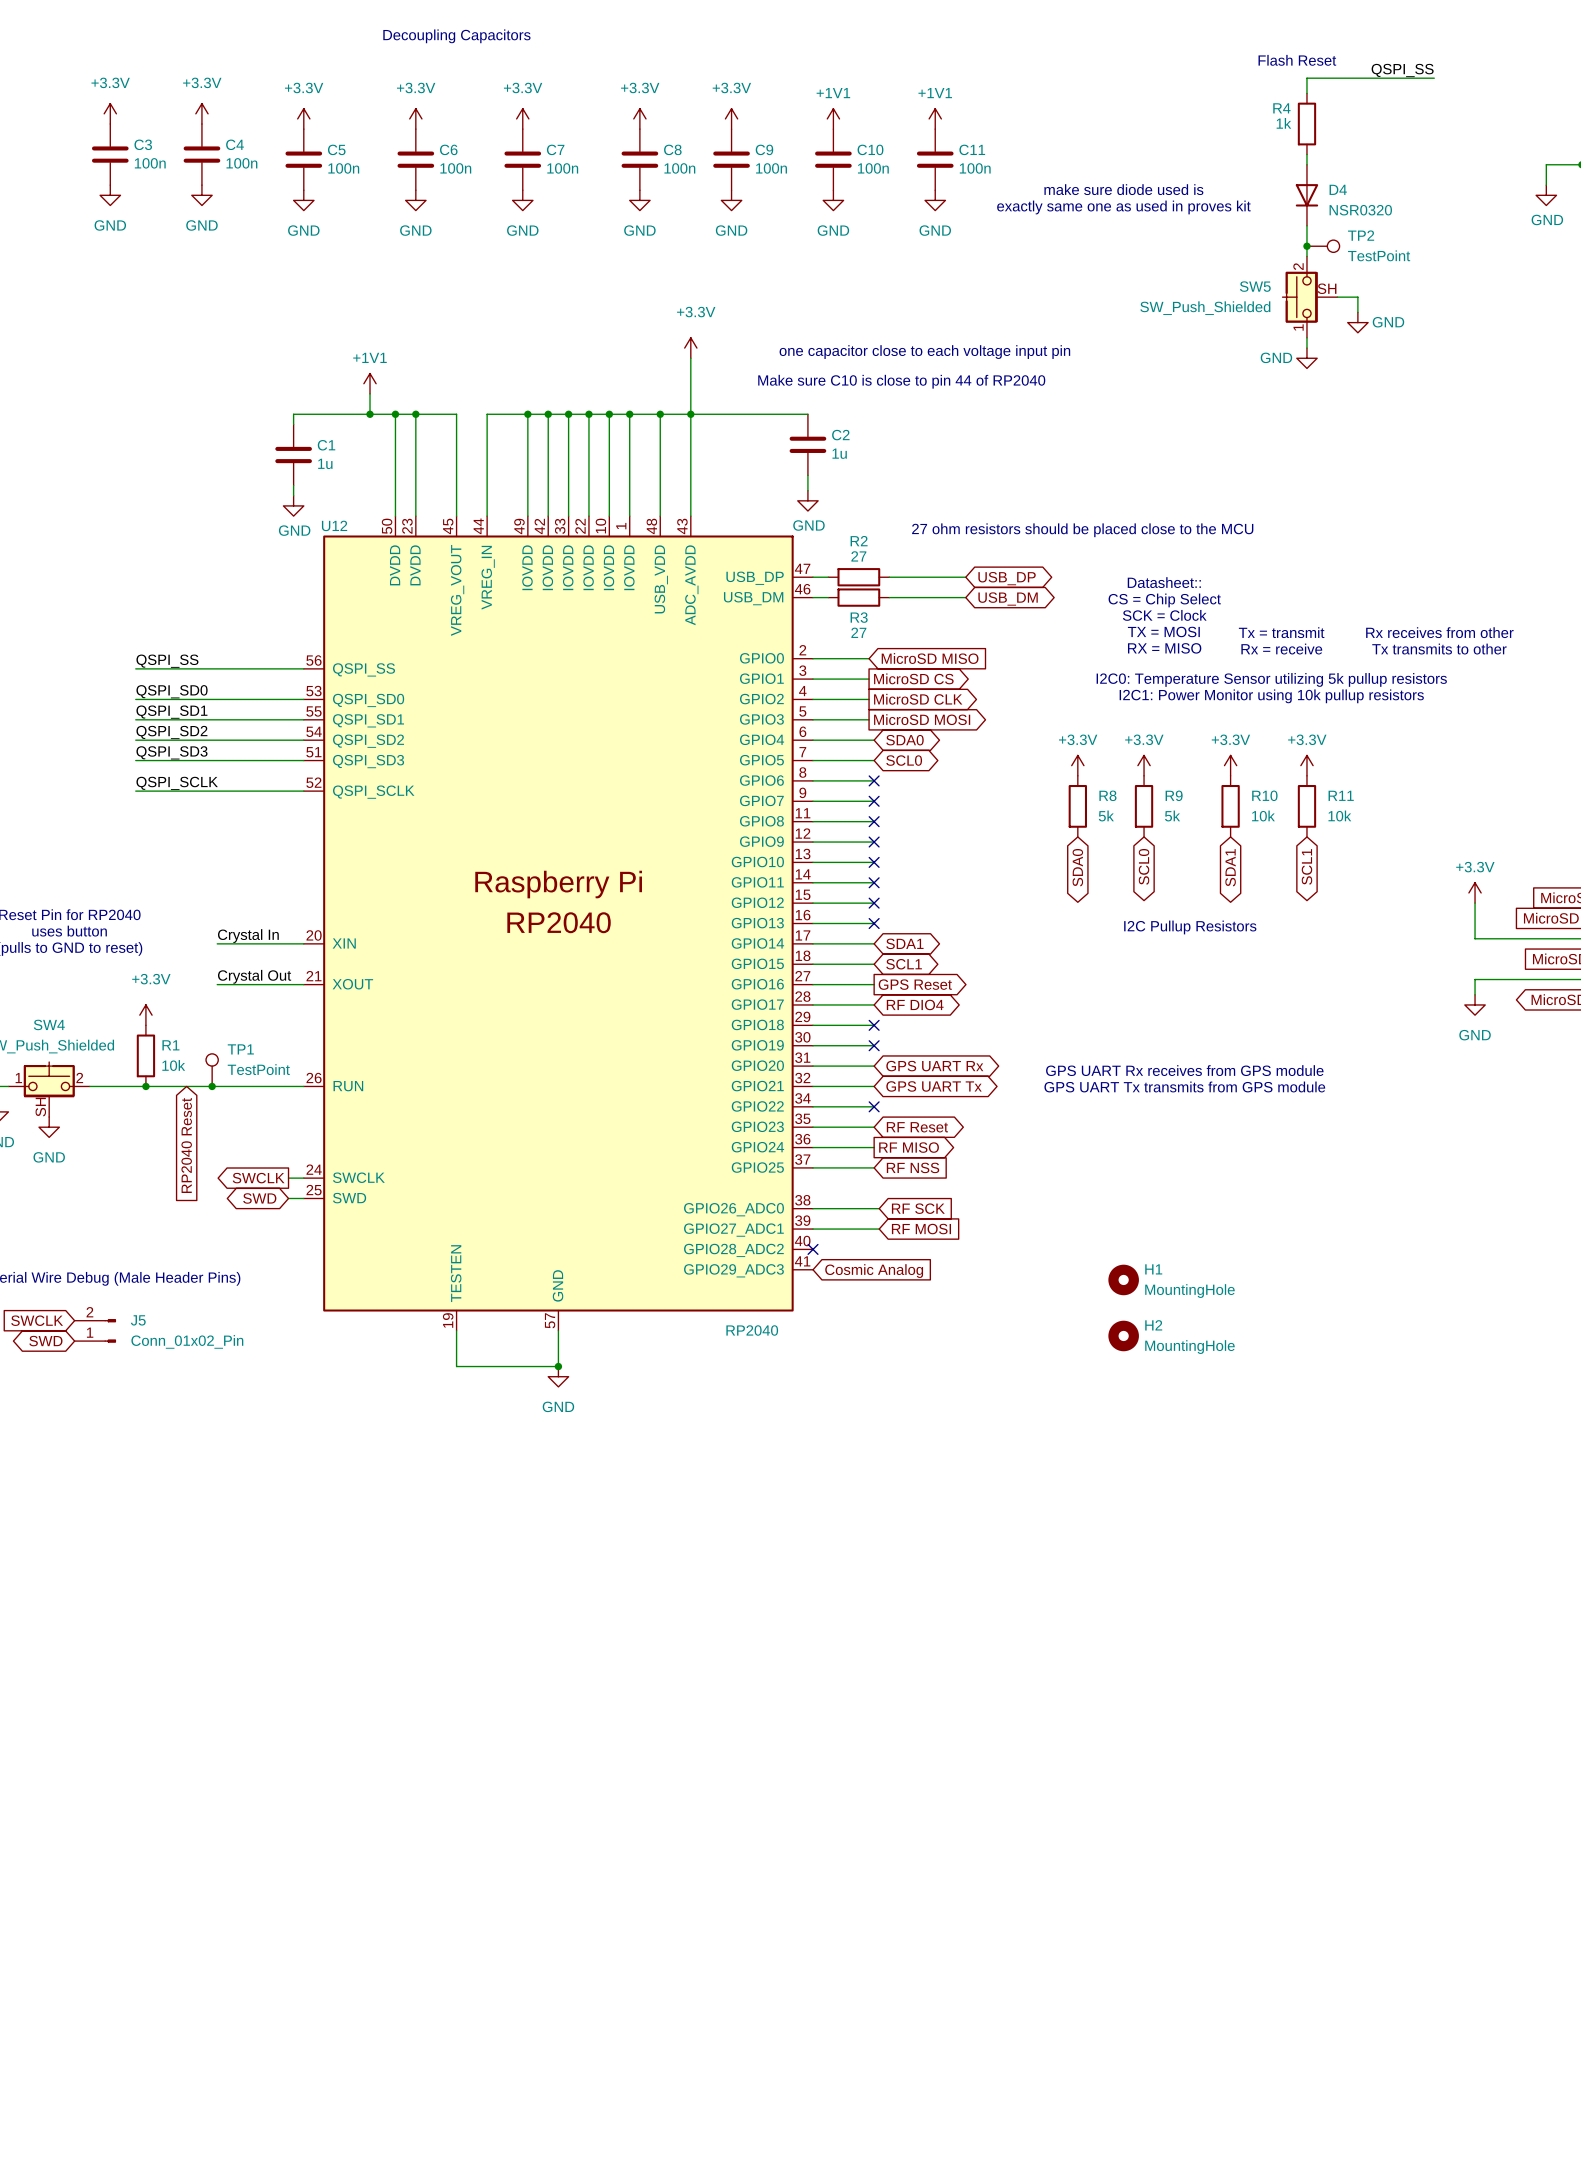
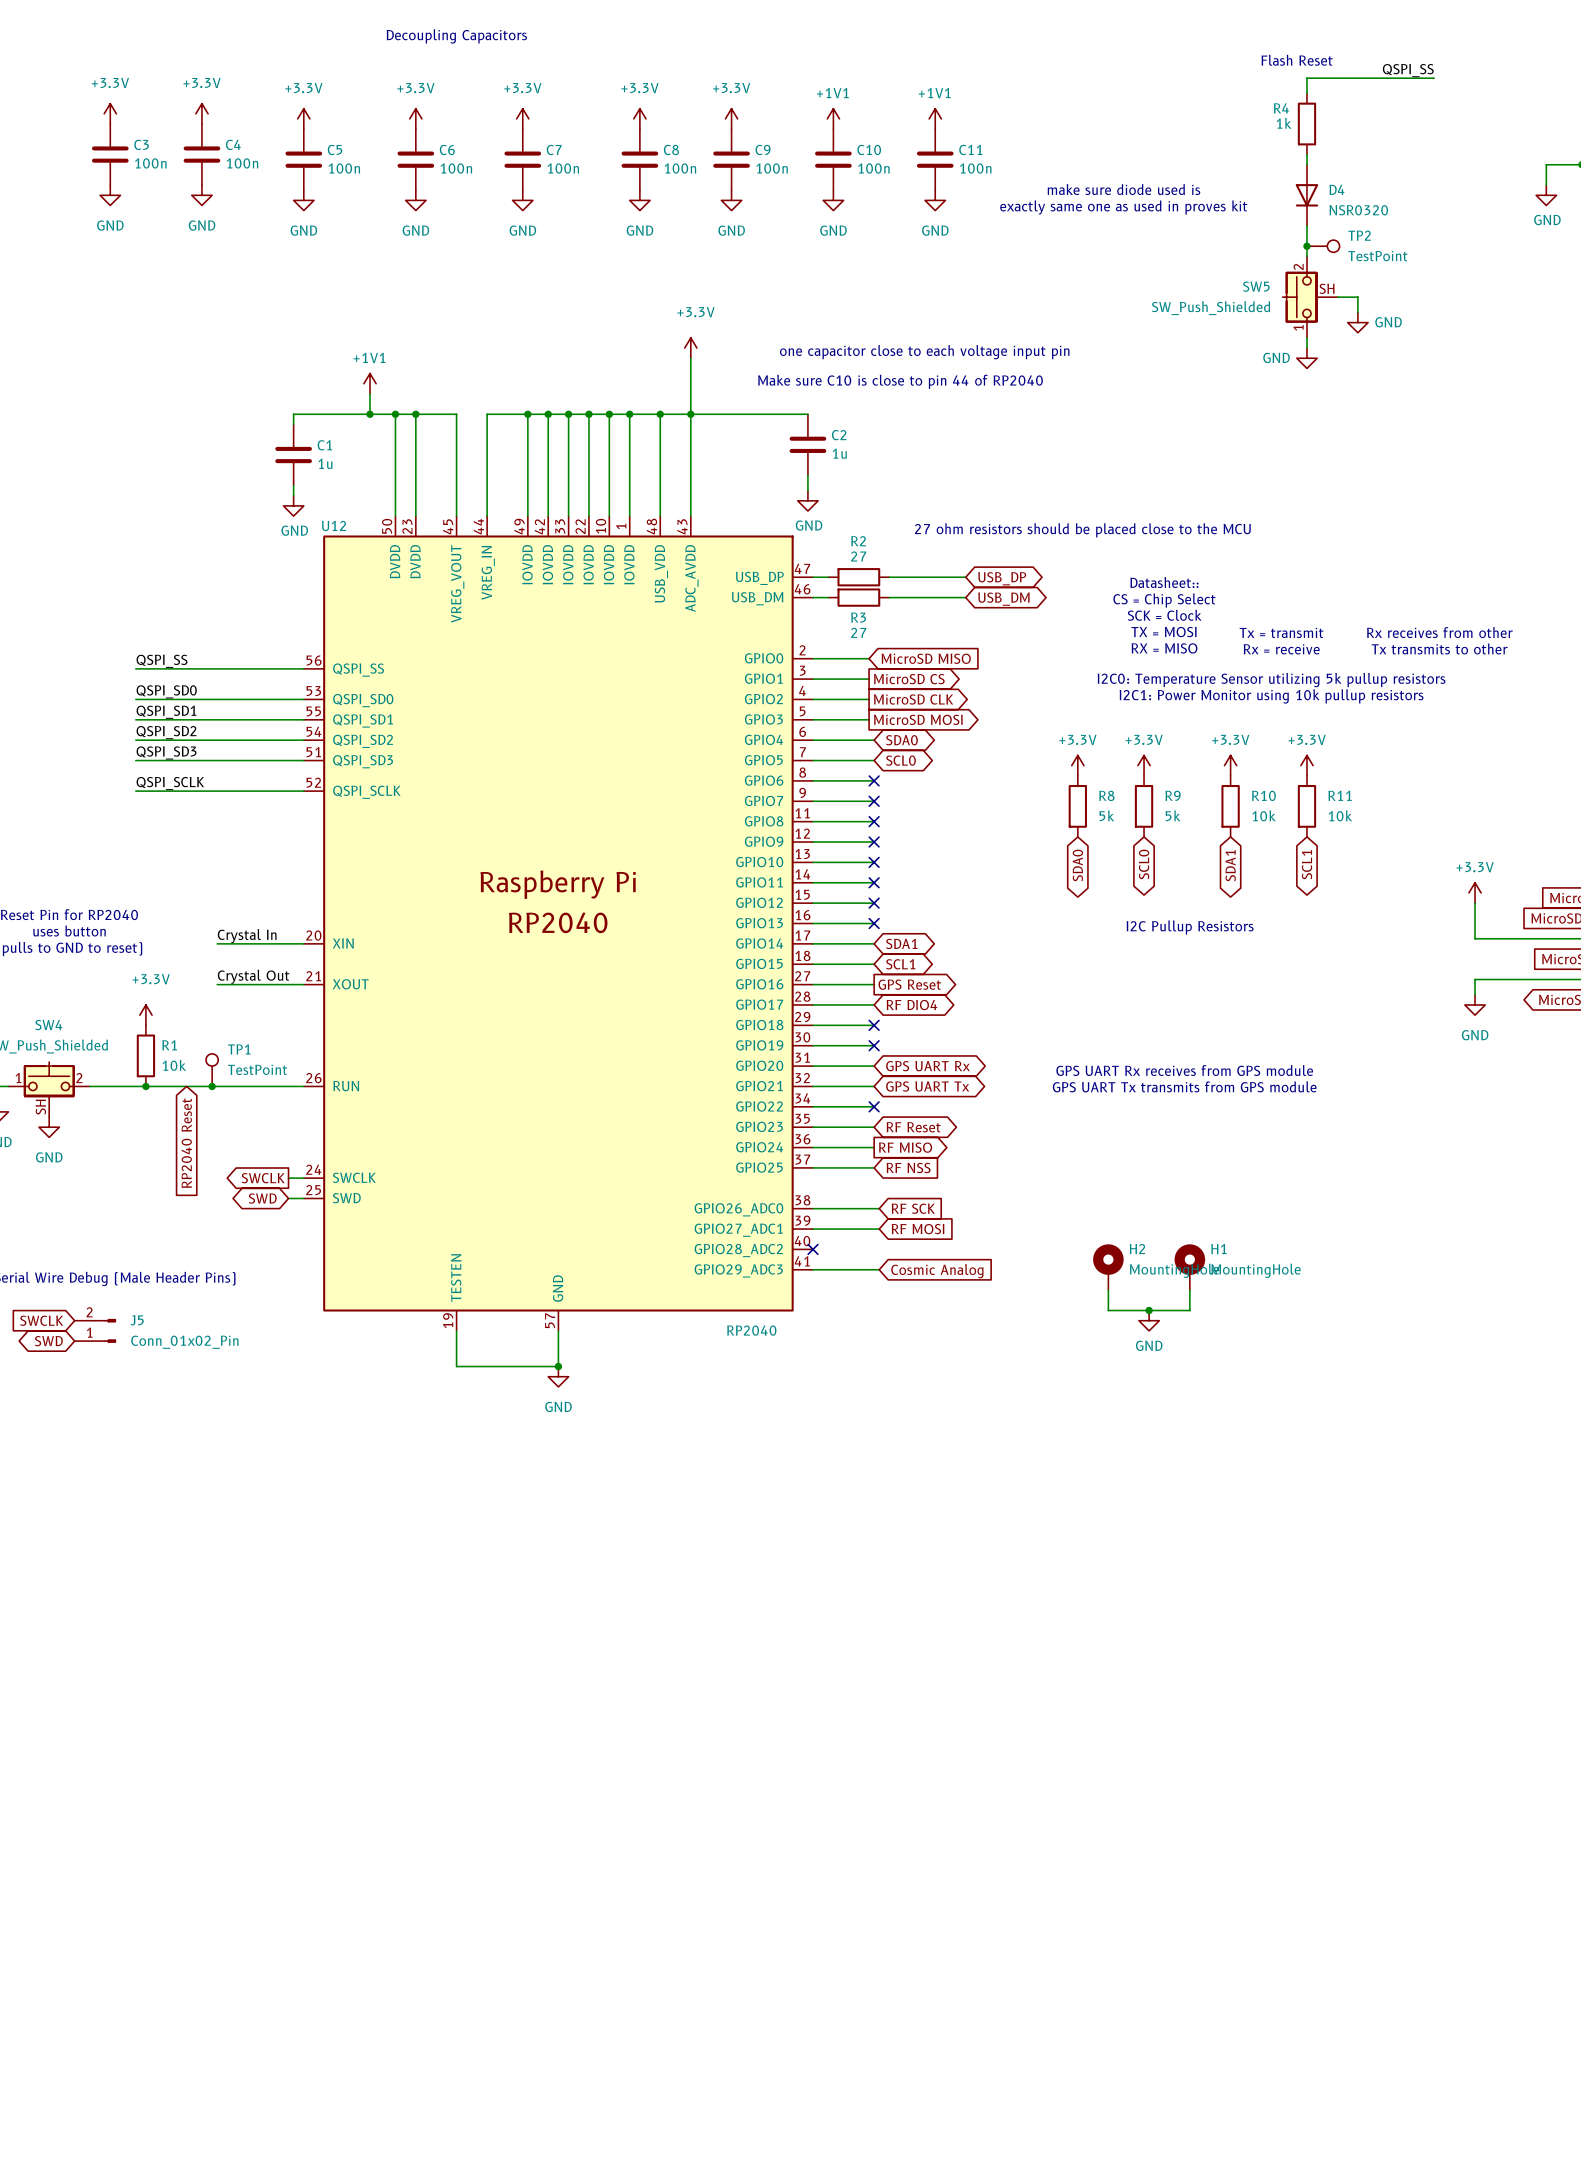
H1 symbol: [1108, 1264, 1139, 1296] -> [1174, 1244, 1206, 1291]
wire: none -> (813, 1269) (879, 1269)
global label position: Cosmic Analog (874, 1271) -> Cosmic Analog (937, 1271)
wire: none -> (1108, 1290) (1108, 1310) (1189, 1310) (1189, 1290)
junction: none -> (1149, 1310)
H2 symbol: [1108, 1320, 1139, 1352] -> [1093, 1244, 1124, 1291]
power symbol: none -> GND (1149, 1320)

